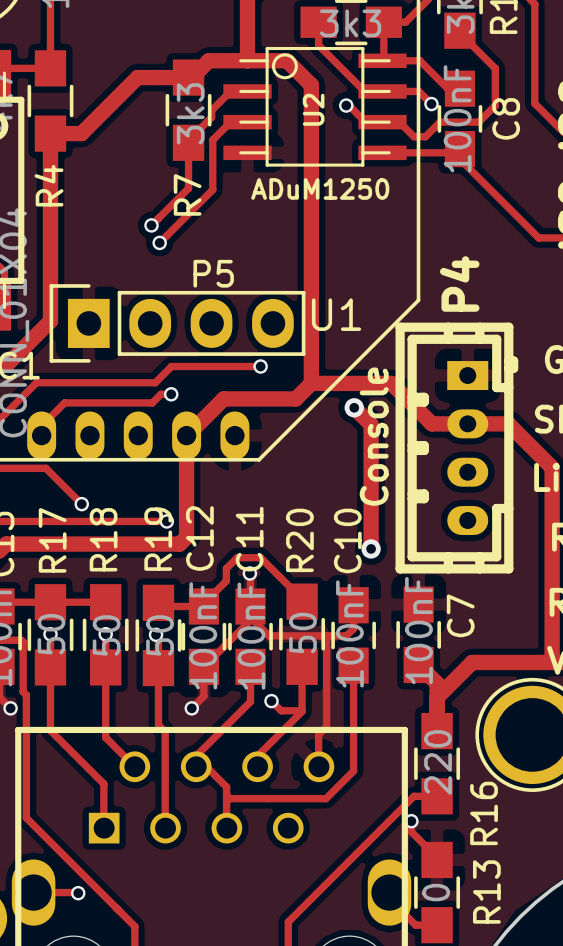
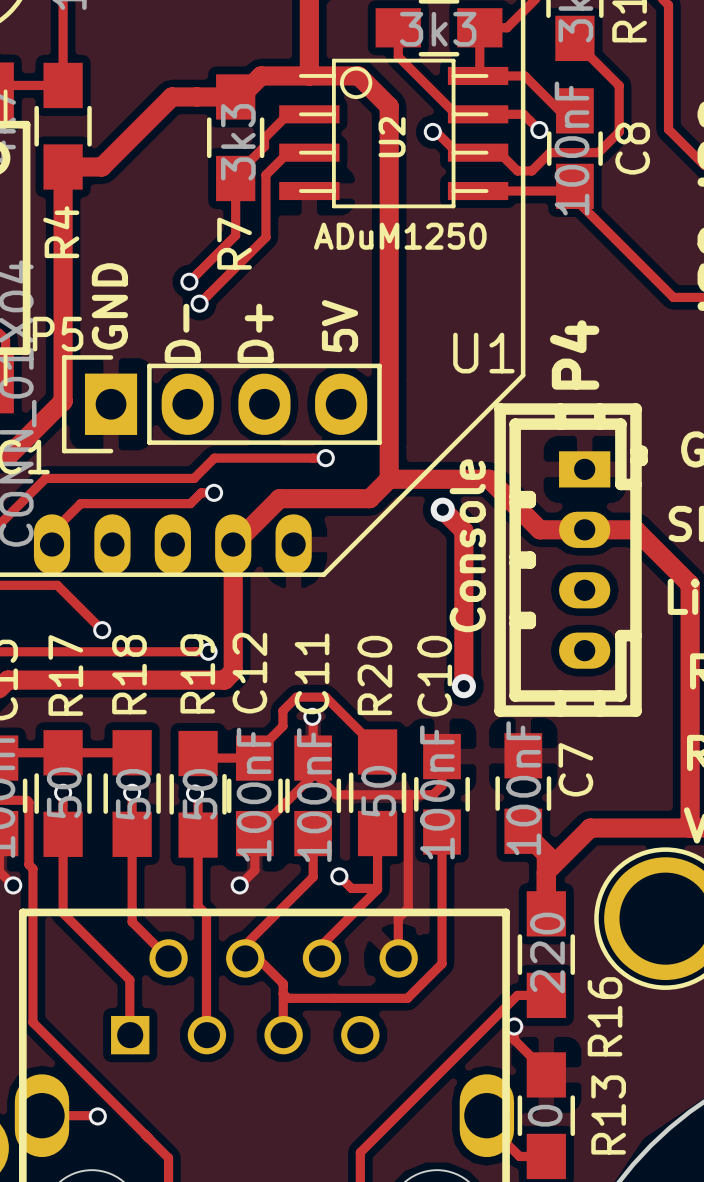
text: none -> GND (109, 306)
text: none -> 5V (340, 326)
text: none -> D- (182, 333)
text: none -> D+ (255, 333)
P5 name position: P5 (213, 273) -> P5 (58, 334)
U1 name position: U1 (336, 314) -> U1 (483, 353)

